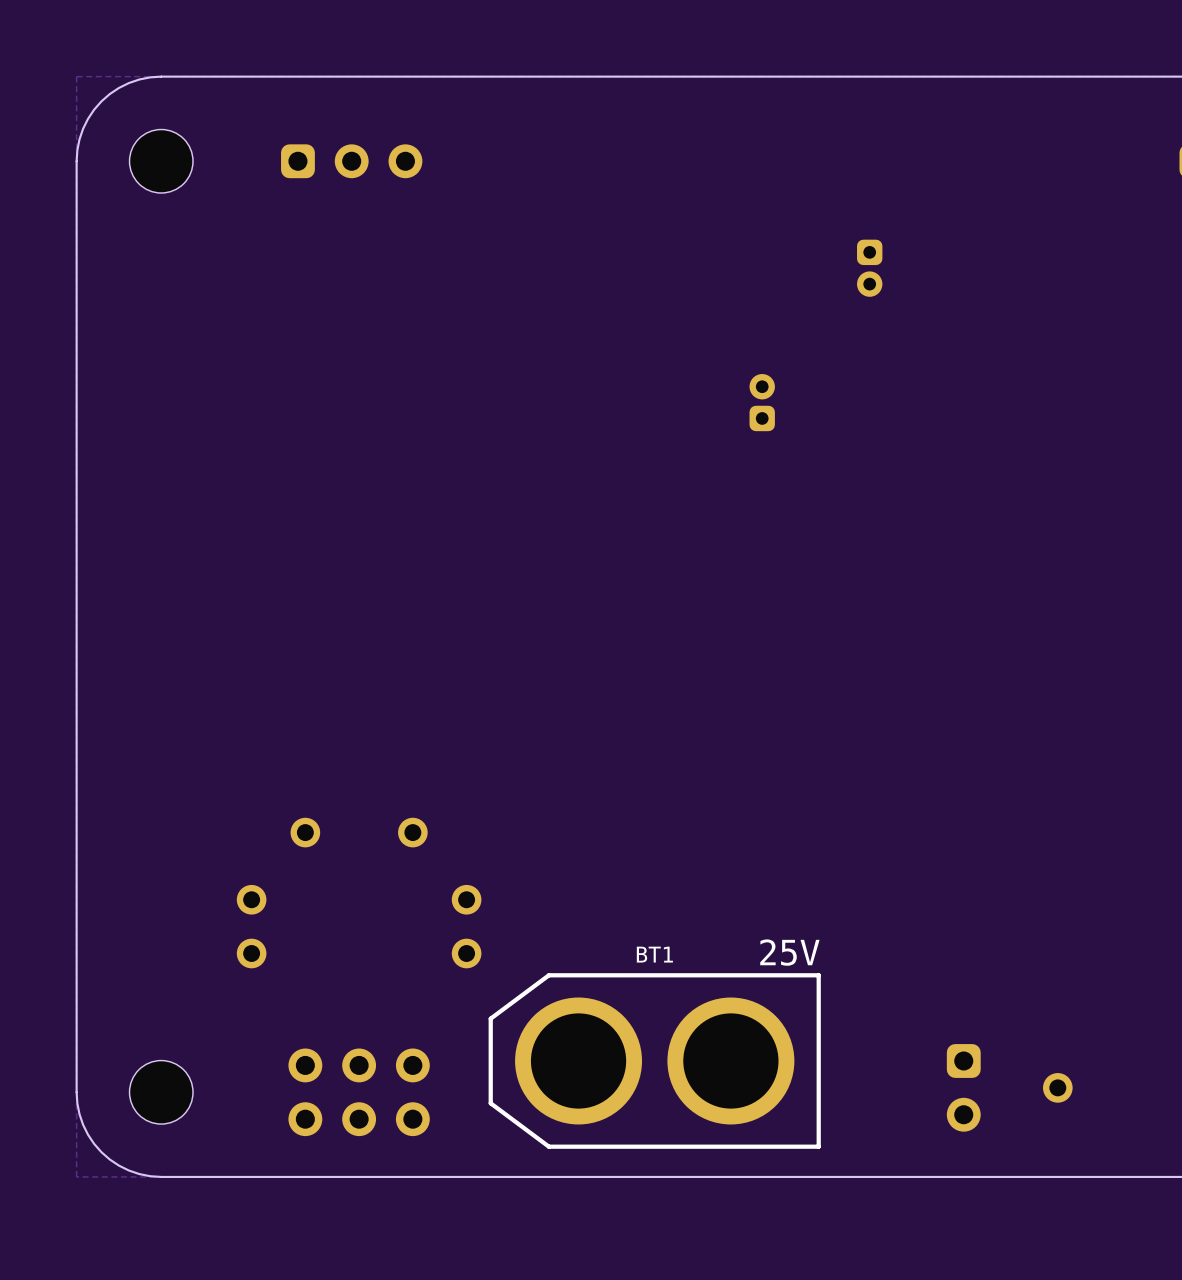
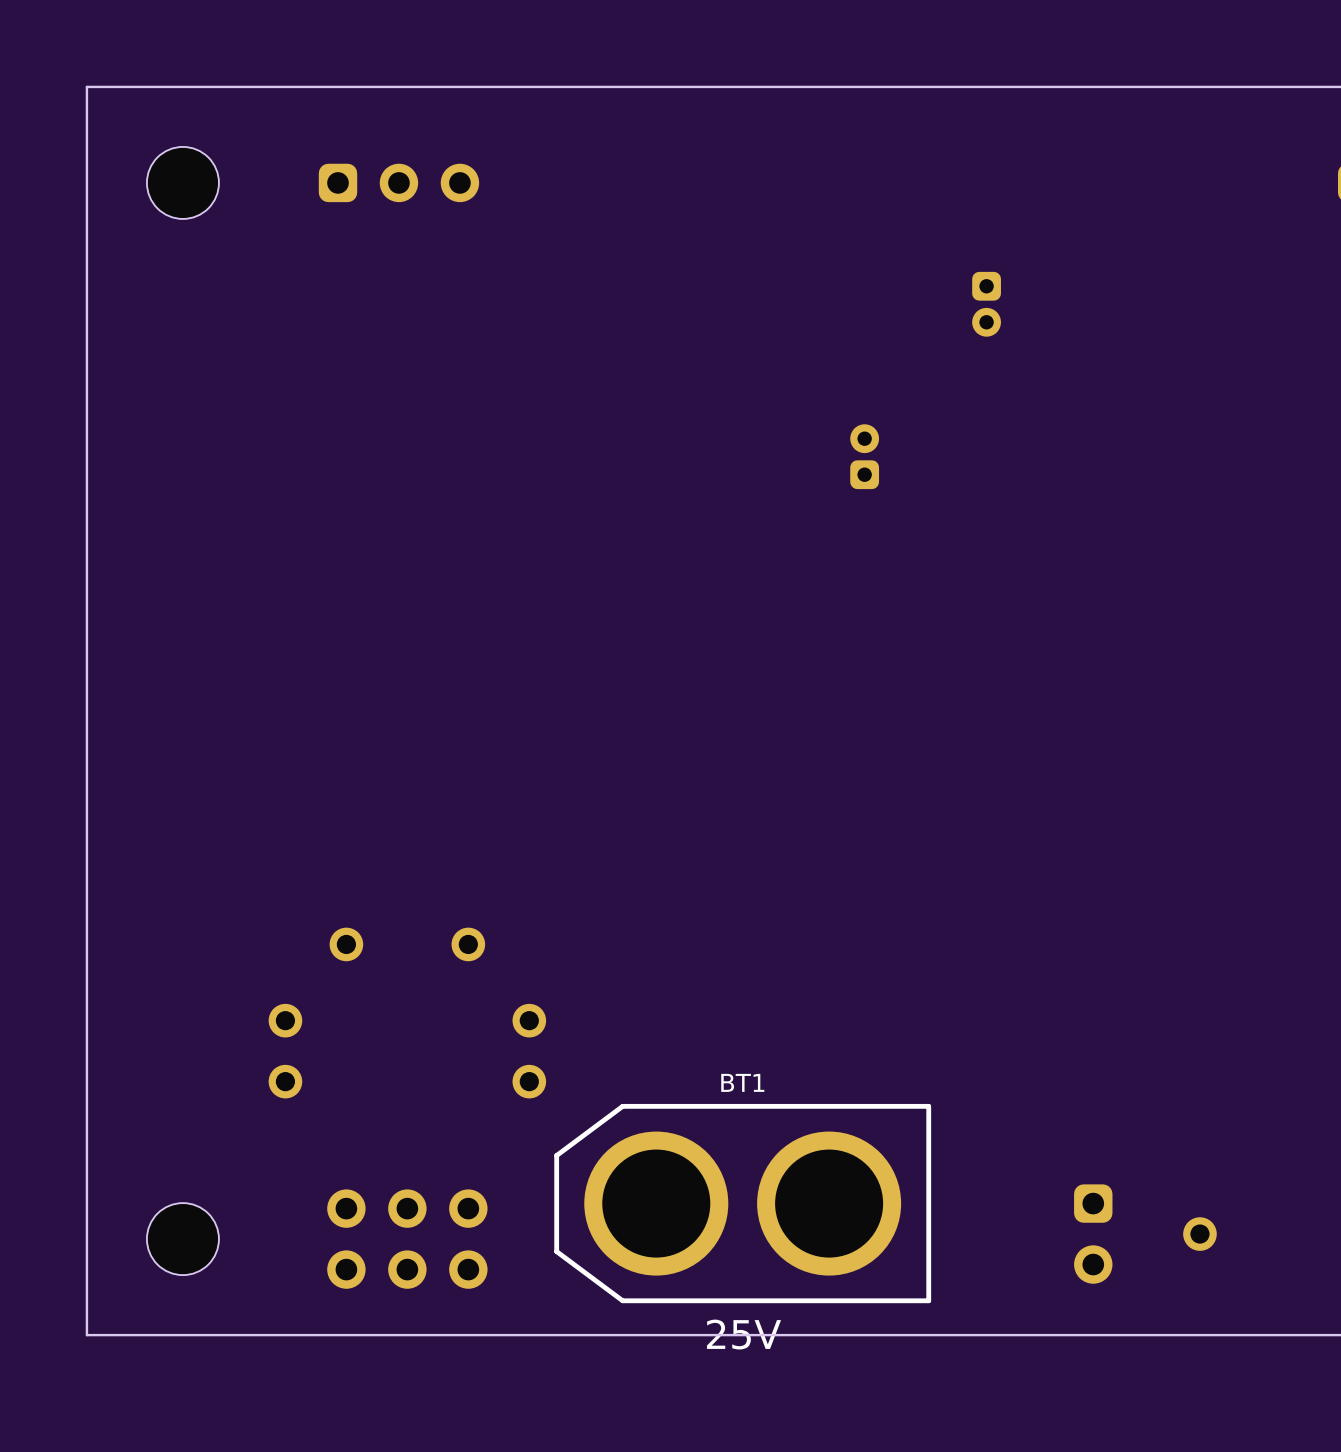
board edge: (161, 76) (128, 83) (101, 101) (83, 128) (76, 161) -> (182, 86) (86, 86) (86, 182)
BT1 value position: 25V (789, 952) -> 25V (743, 1334)
board edge: (76, 1092) (83, 1124) (101, 1152) (128, 1170) (161, 1176) -> (86, 1239) (86, 1335) (182, 1335)

